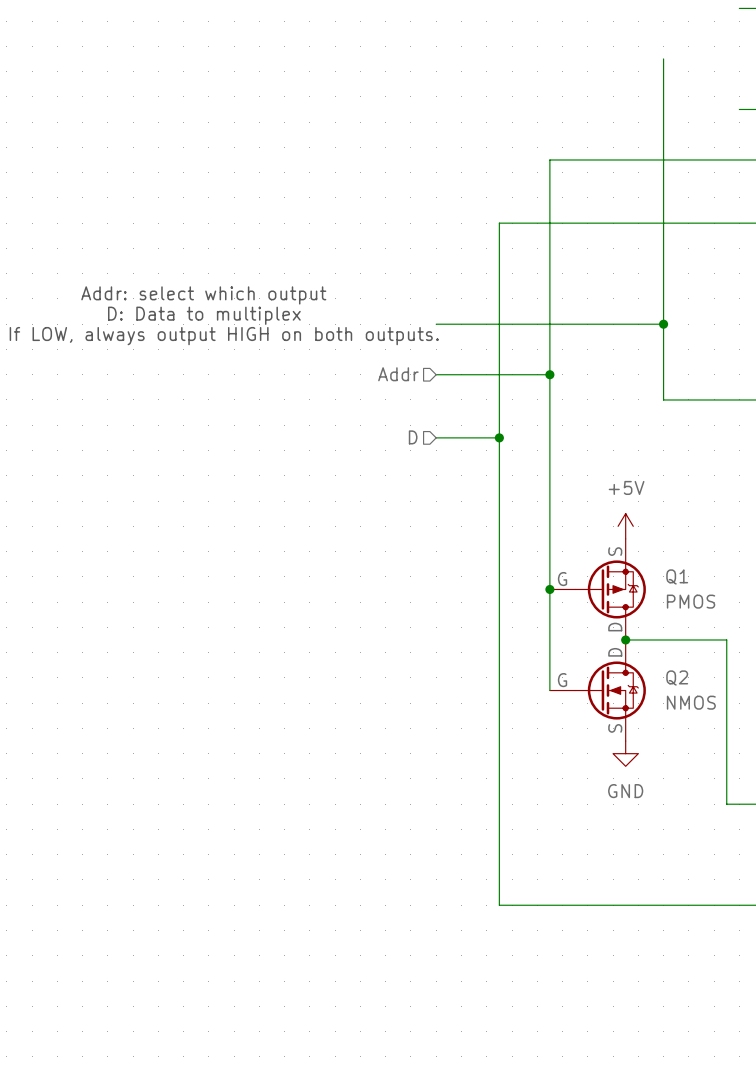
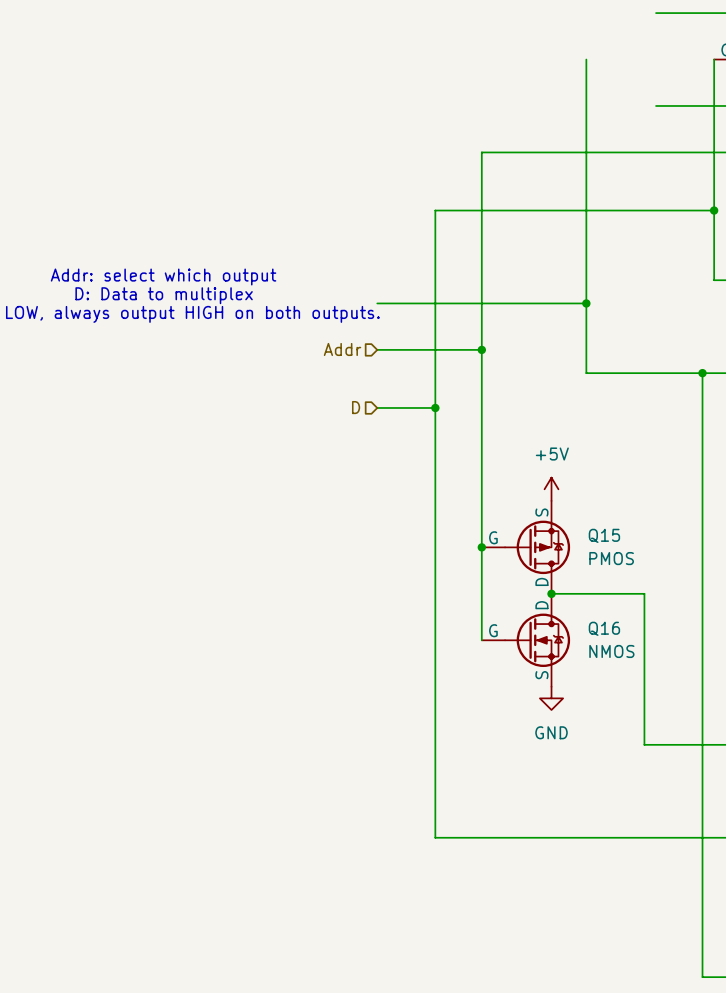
Q1 name: Q1 (677, 576) -> Q15 (604, 535)
Q2 name: Q2 (677, 678) -> Q16 (604, 628)

